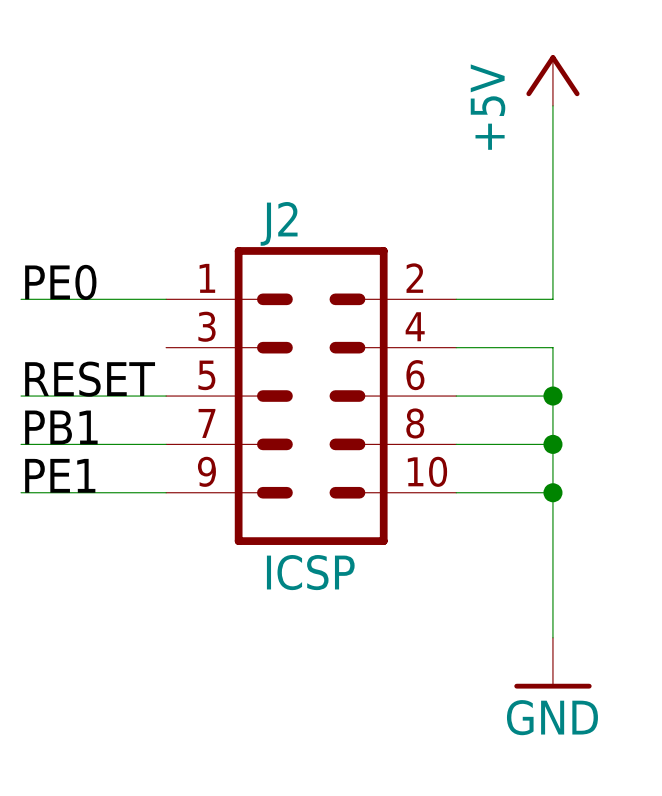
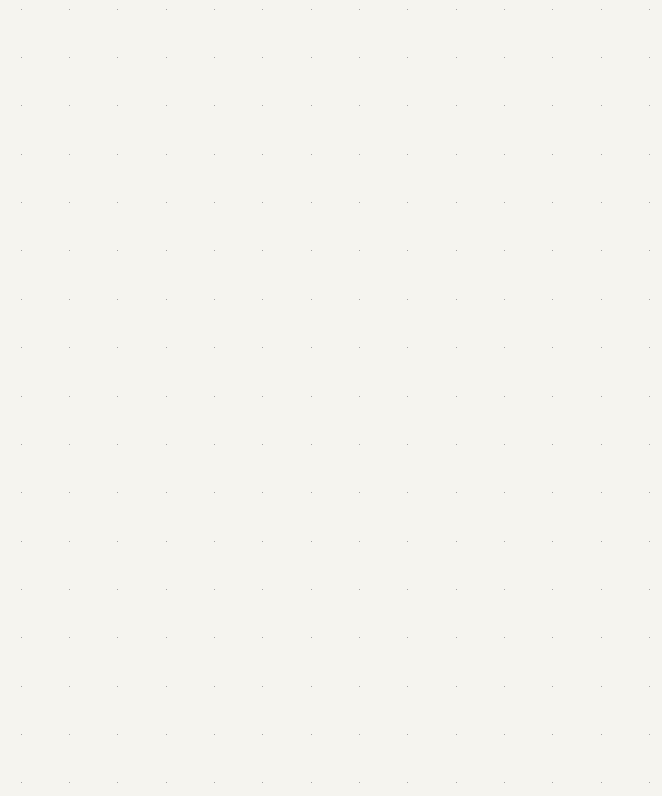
power symbol: +5V (552, 80) -> none
wire: (552, 105) (552, 299) (456, 299) -> none
label: PE0 (60, 282) -> none
wire: (21, 299) (166, 299) -> none
wire: (456, 347) (552, 347) (552, 637) -> none
label: RESET (90, 379) -> none
wire: (21, 396) (166, 396) -> none
J2: ICSP (311, 396) -> none
wire: (456, 396) (552, 396) -> none
junction: (552, 396) -> none
label: PB1 (61, 427) -> none
wire: (21, 444) (166, 444) -> none
wire: (456, 444) (552, 444) -> none
junction: (552, 444) -> none
label: PE1 (60, 475) -> none
wire: (21, 492) (166, 492) -> none
wire: (456, 492) (552, 492) -> none
junction: (552, 492) -> none
power symbol: GND (552, 663) -> none

